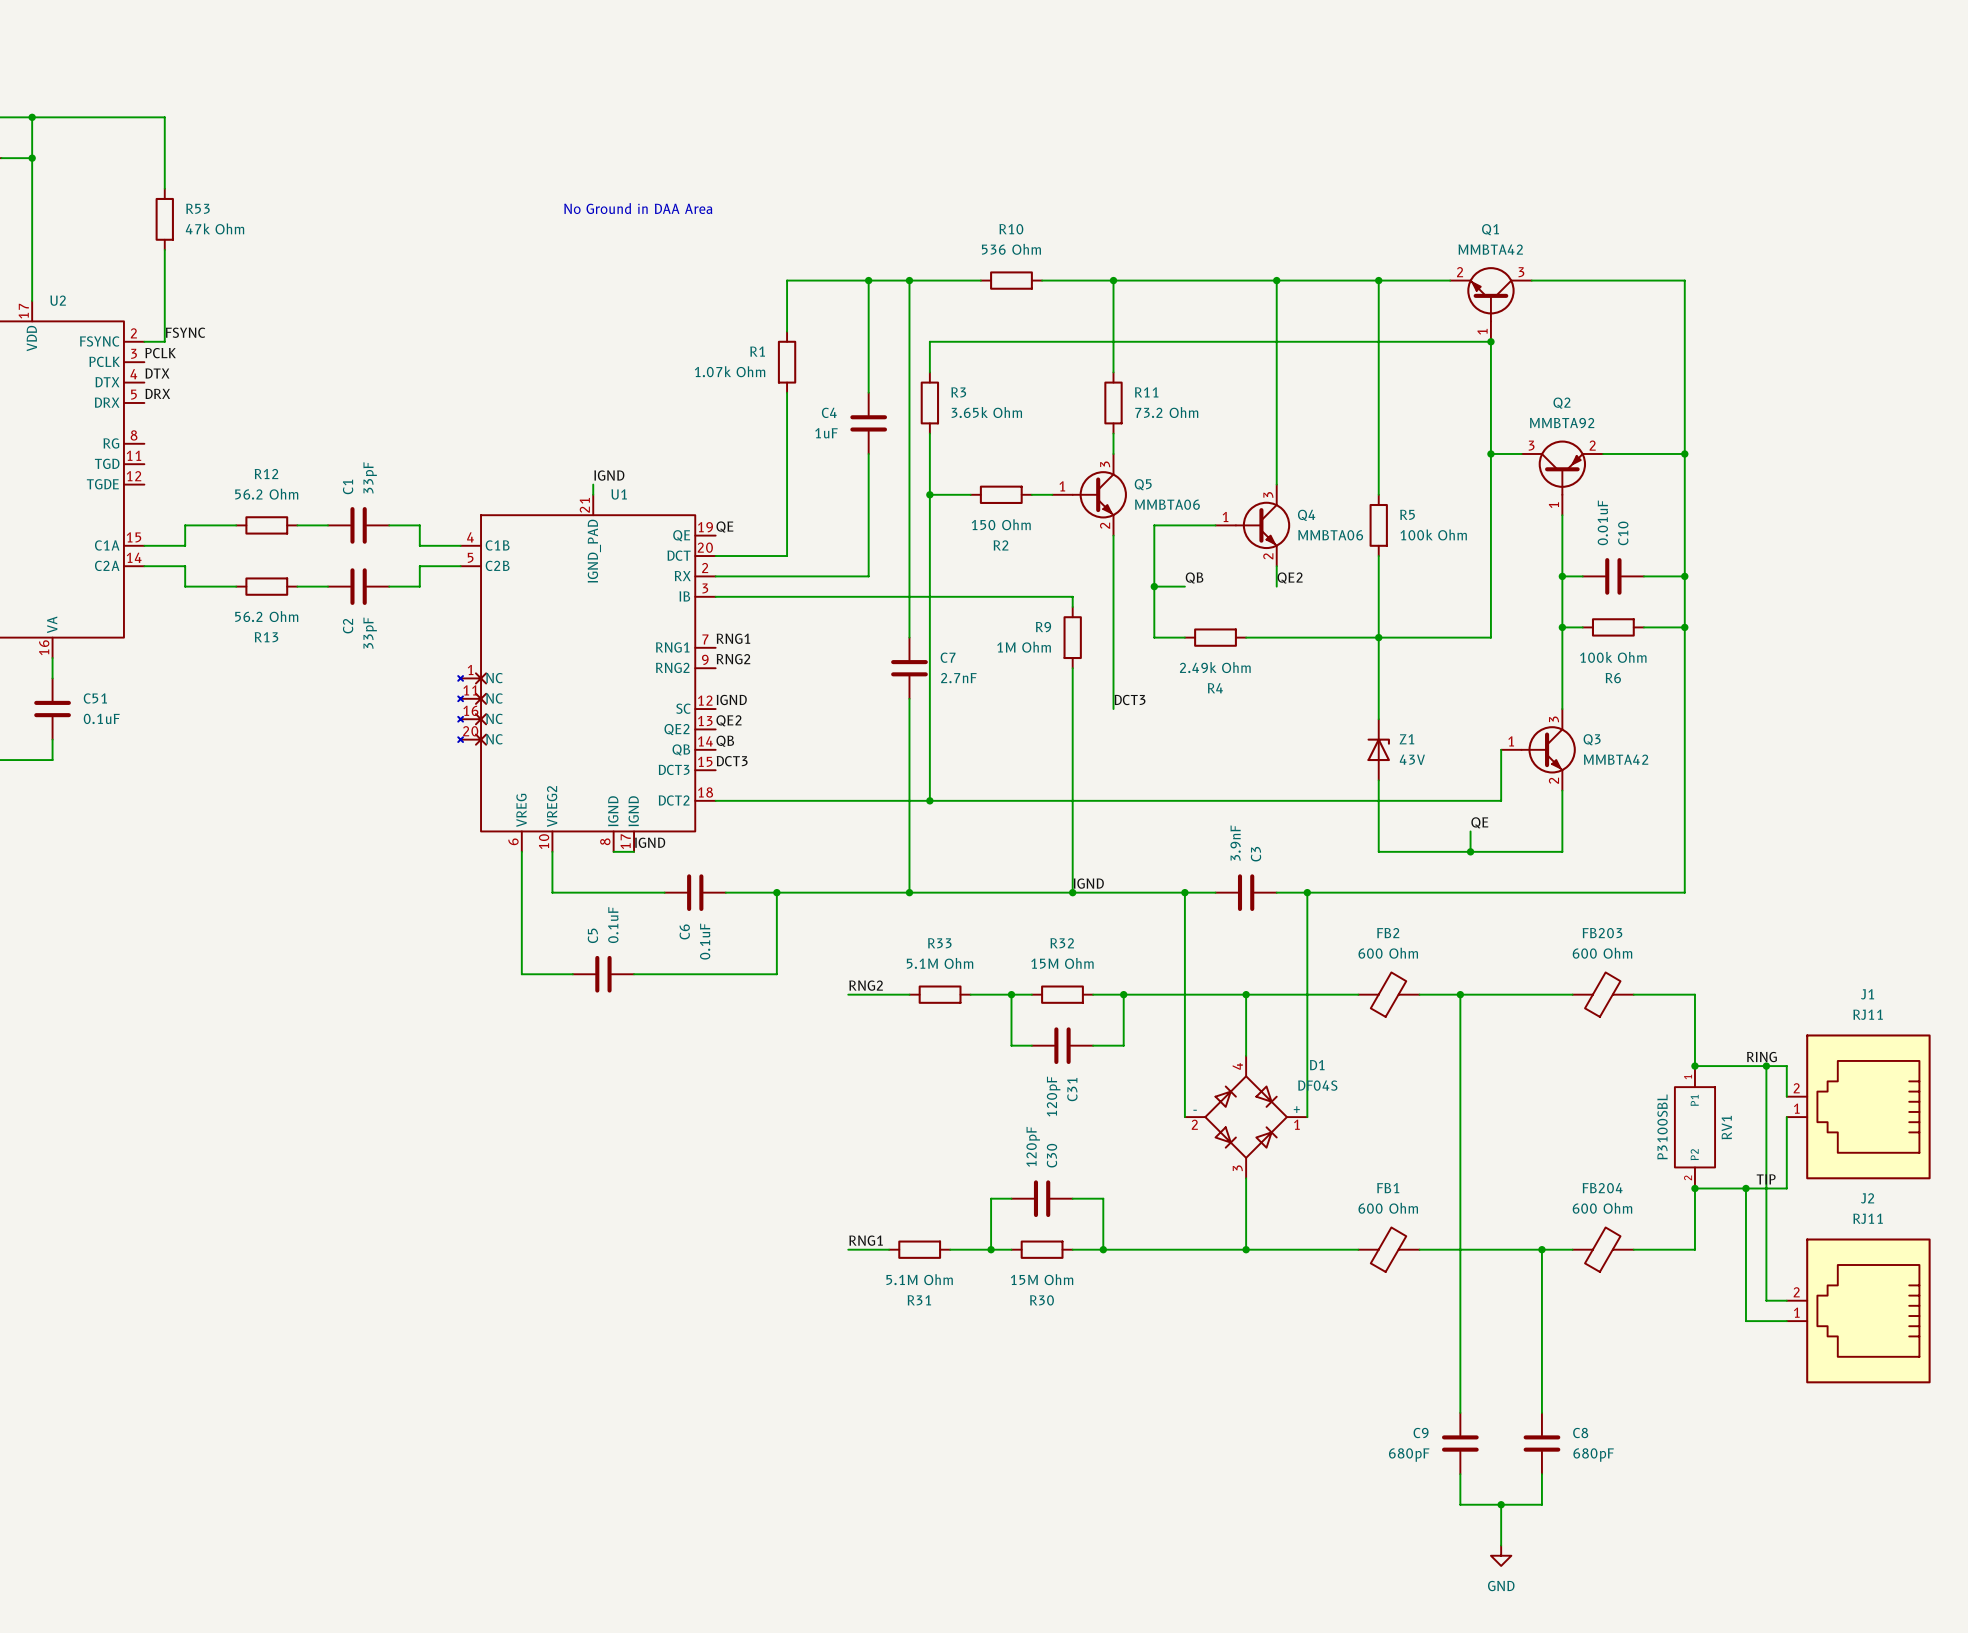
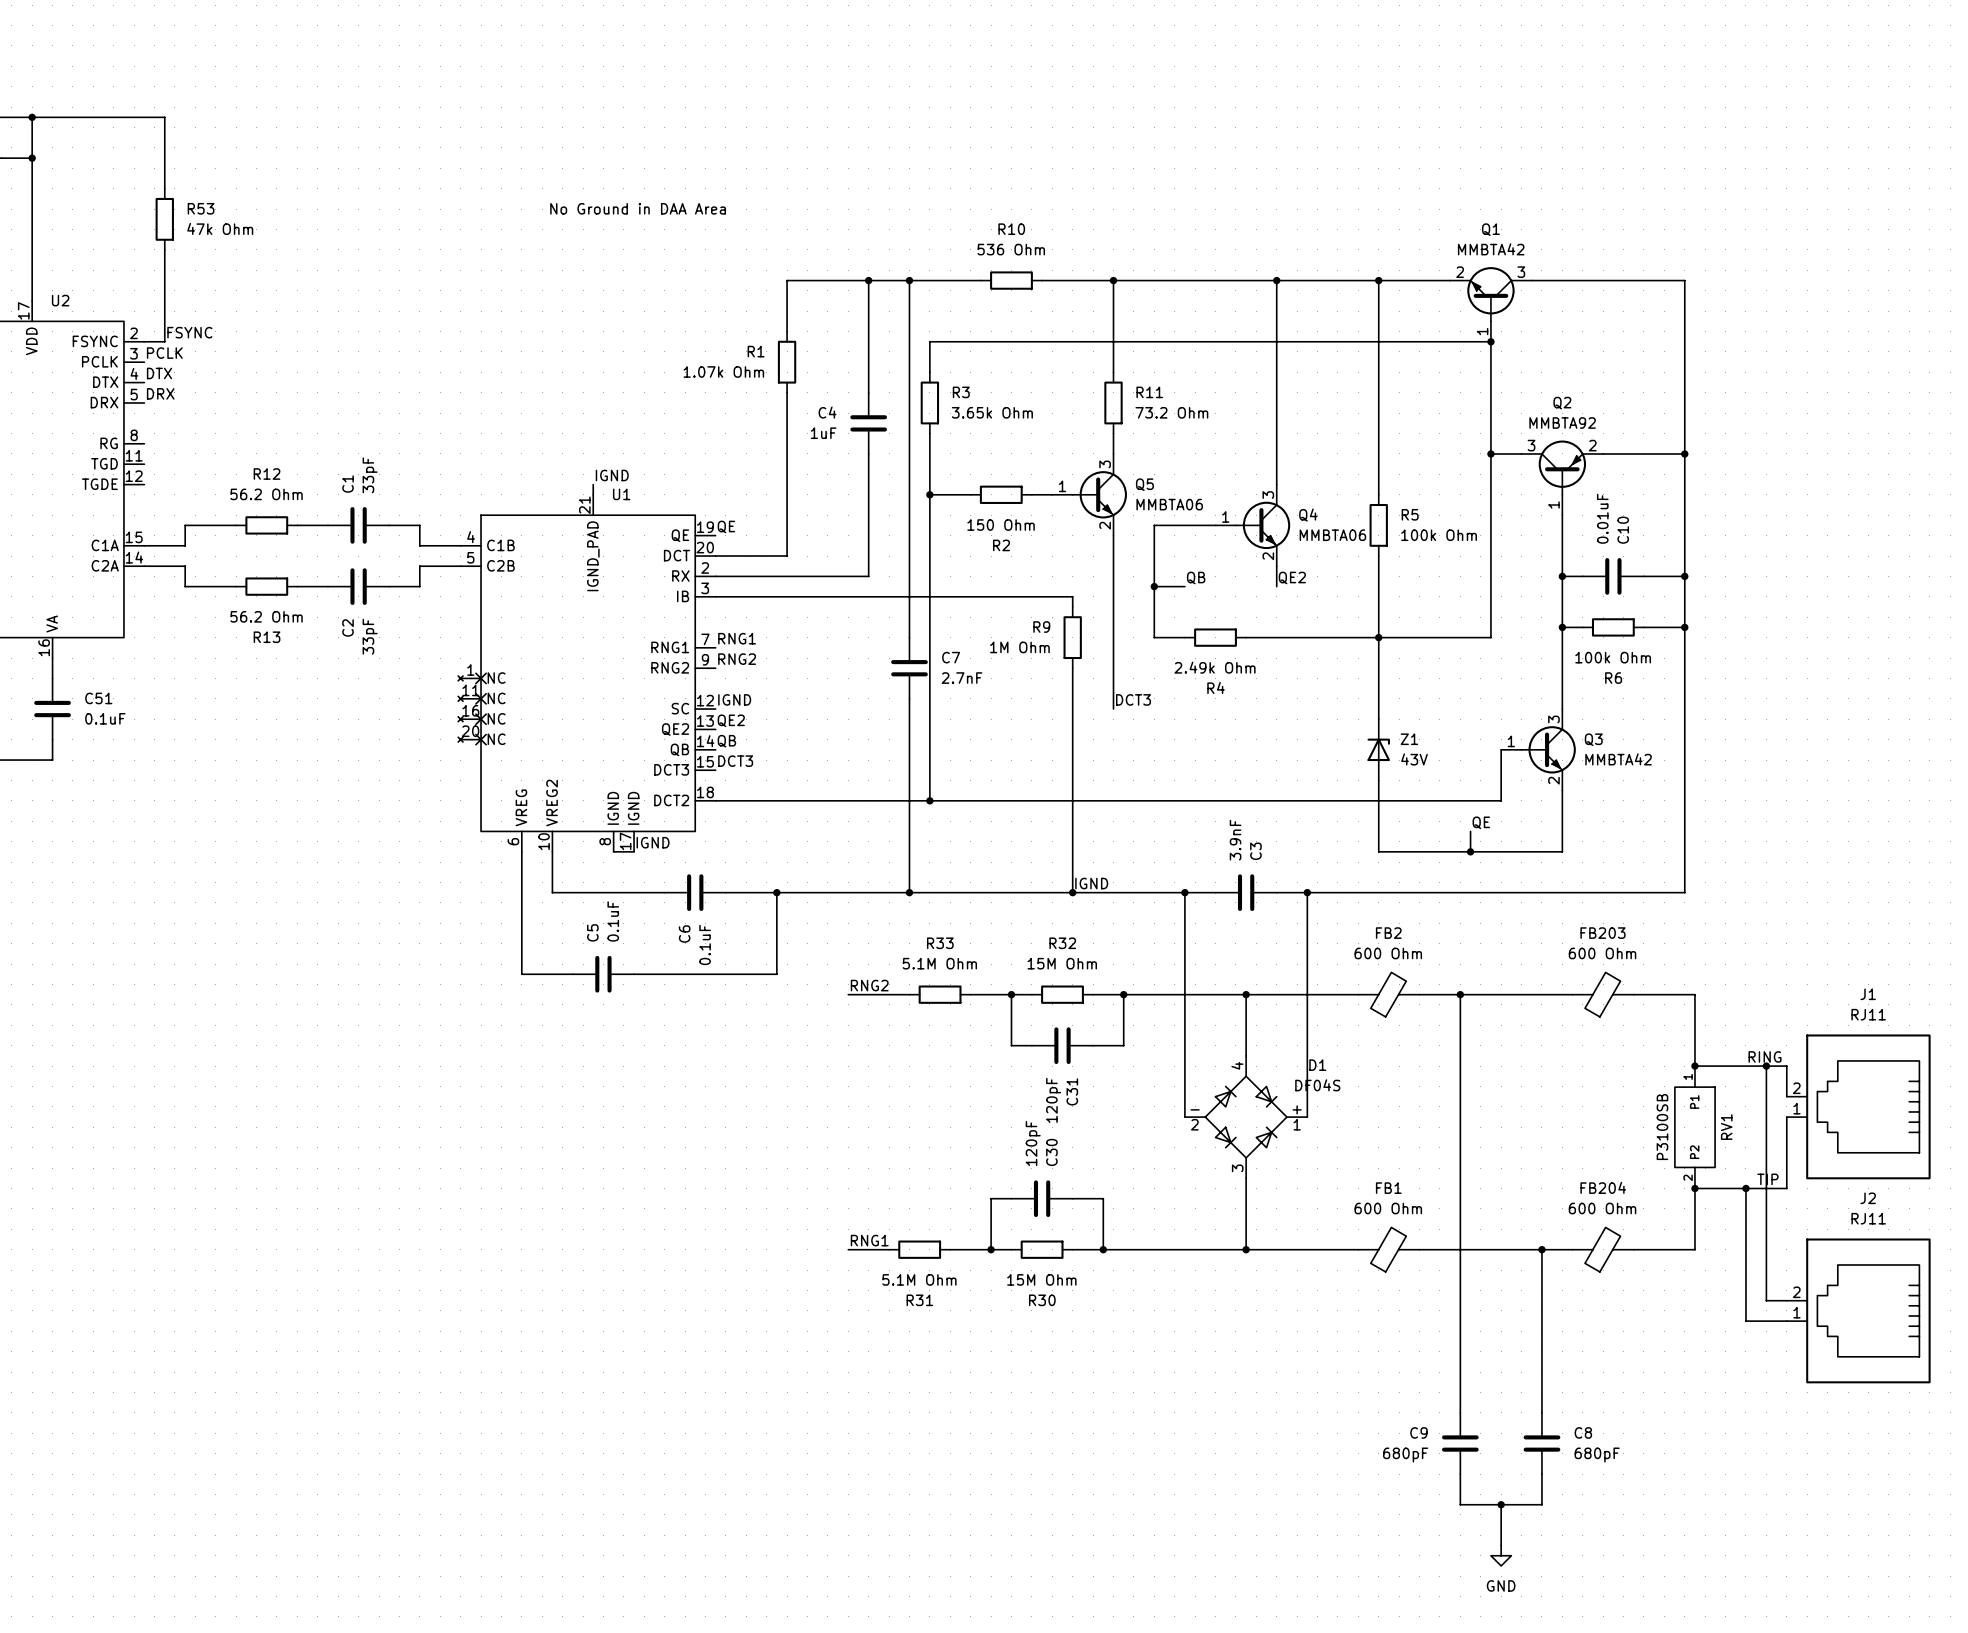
RV1 value: P3100SBL (1662, 1126) -> P3100SB (1662, 1127)

